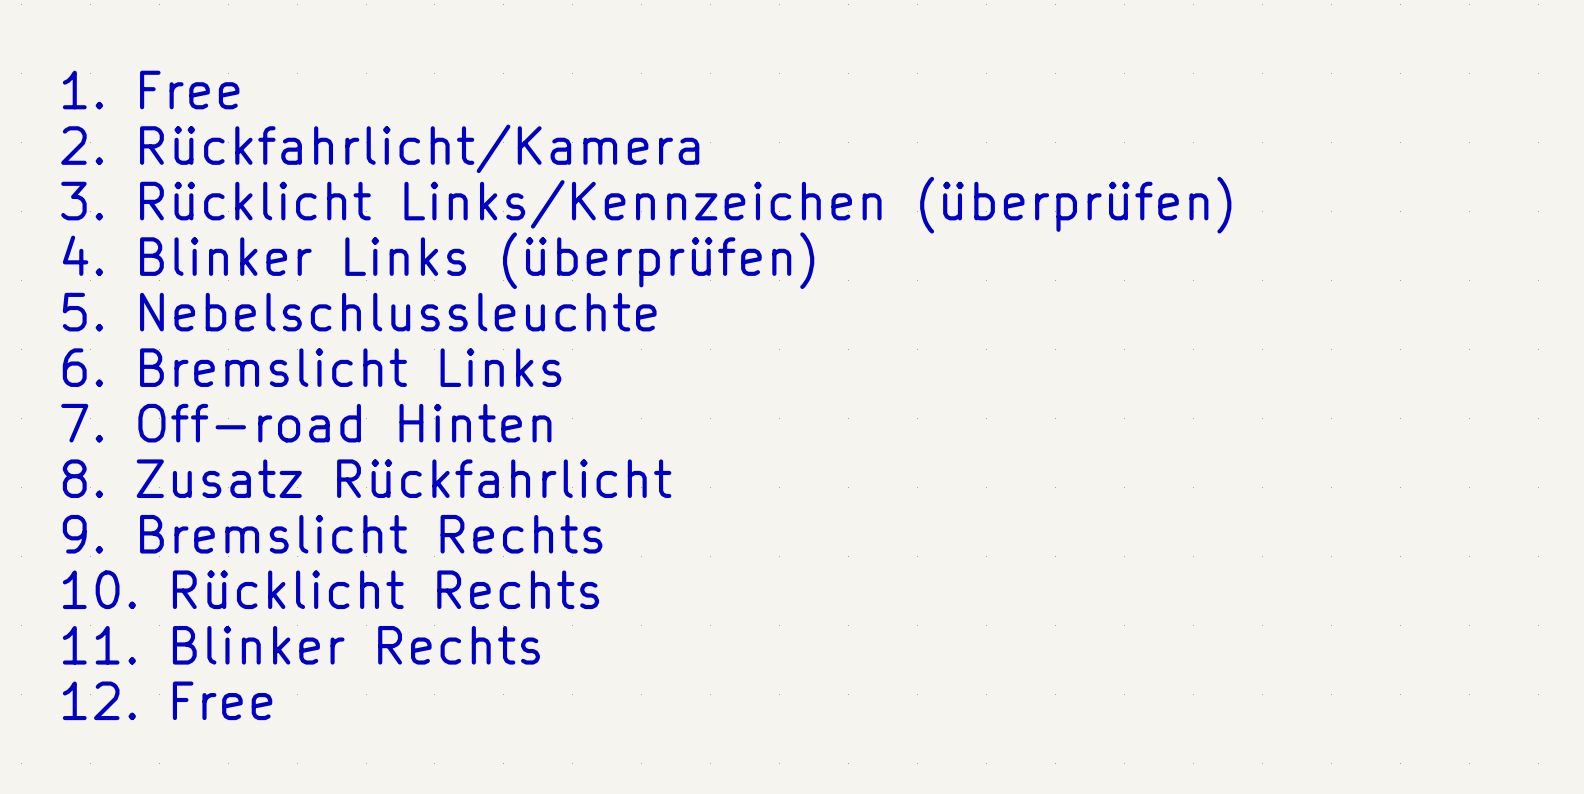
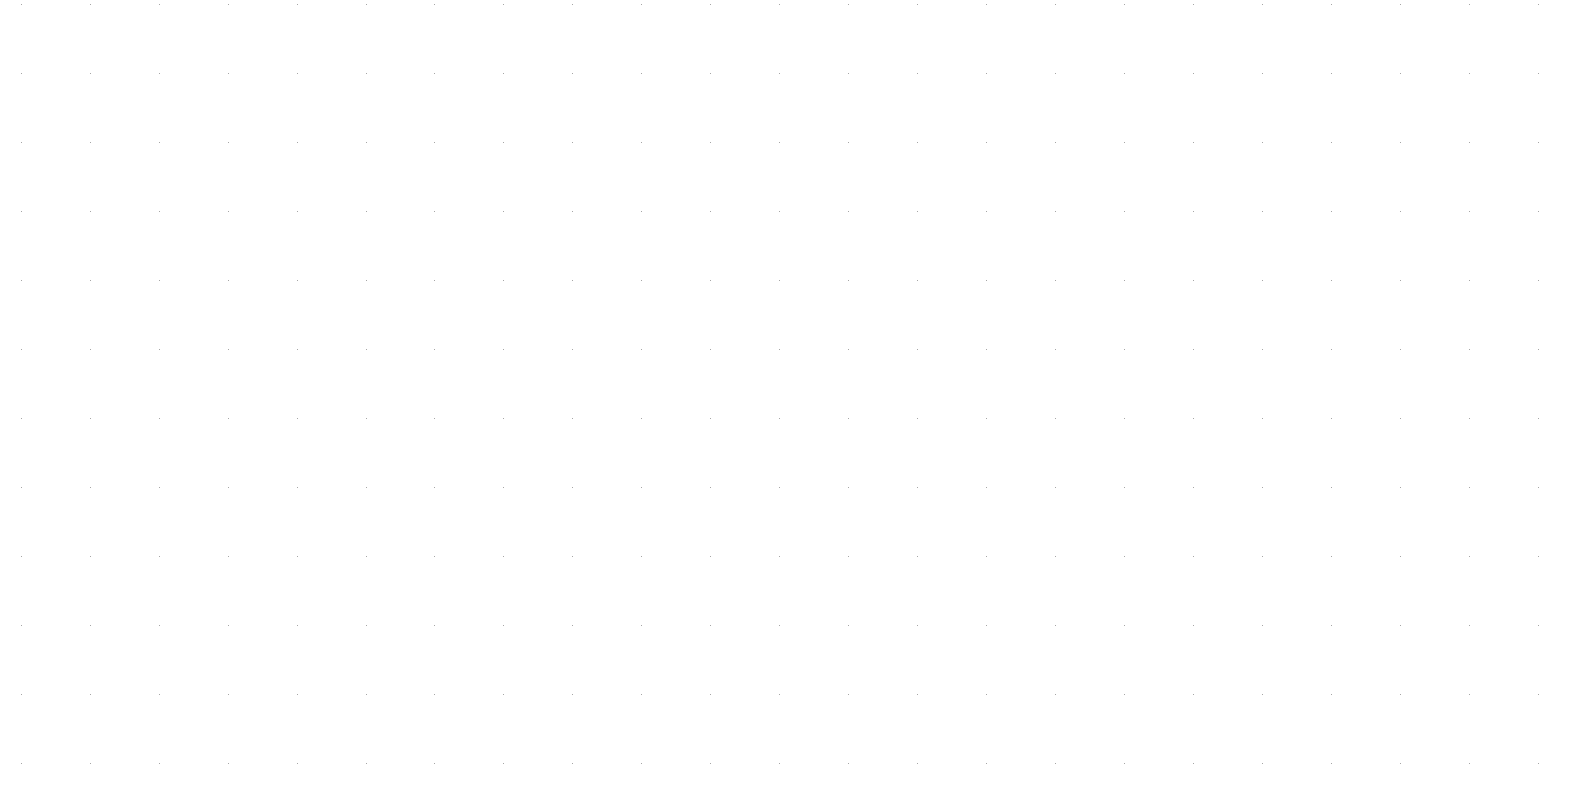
text: 1. Free (151, 90) -> none
text: 2. Rückfahrlicht/Kamera (380, 148) -> none
text: 3. Rücklicht Links/Kennzeichen (überprüfen) (646, 205) -> none
text: 4. Blinker Links (überprüfen) (438, 260) -> none
text: 5. Nebelschlussleuchte (359, 312) -> none
text: 6. Bremslicht Links (312, 367) -> none
text: 7. Off-road Hinten (306, 423) -> none
text: 8. Zusatz Rückfahrlicht (367, 478) -> none
text: 9. Bremslicht Rechts (332, 534) -> none
text: 10. Rücklicht Rechts (330, 589) -> none
text: 11. Blinker Rechts (301, 645) -> none
text: 12. Free (167, 700) -> none

